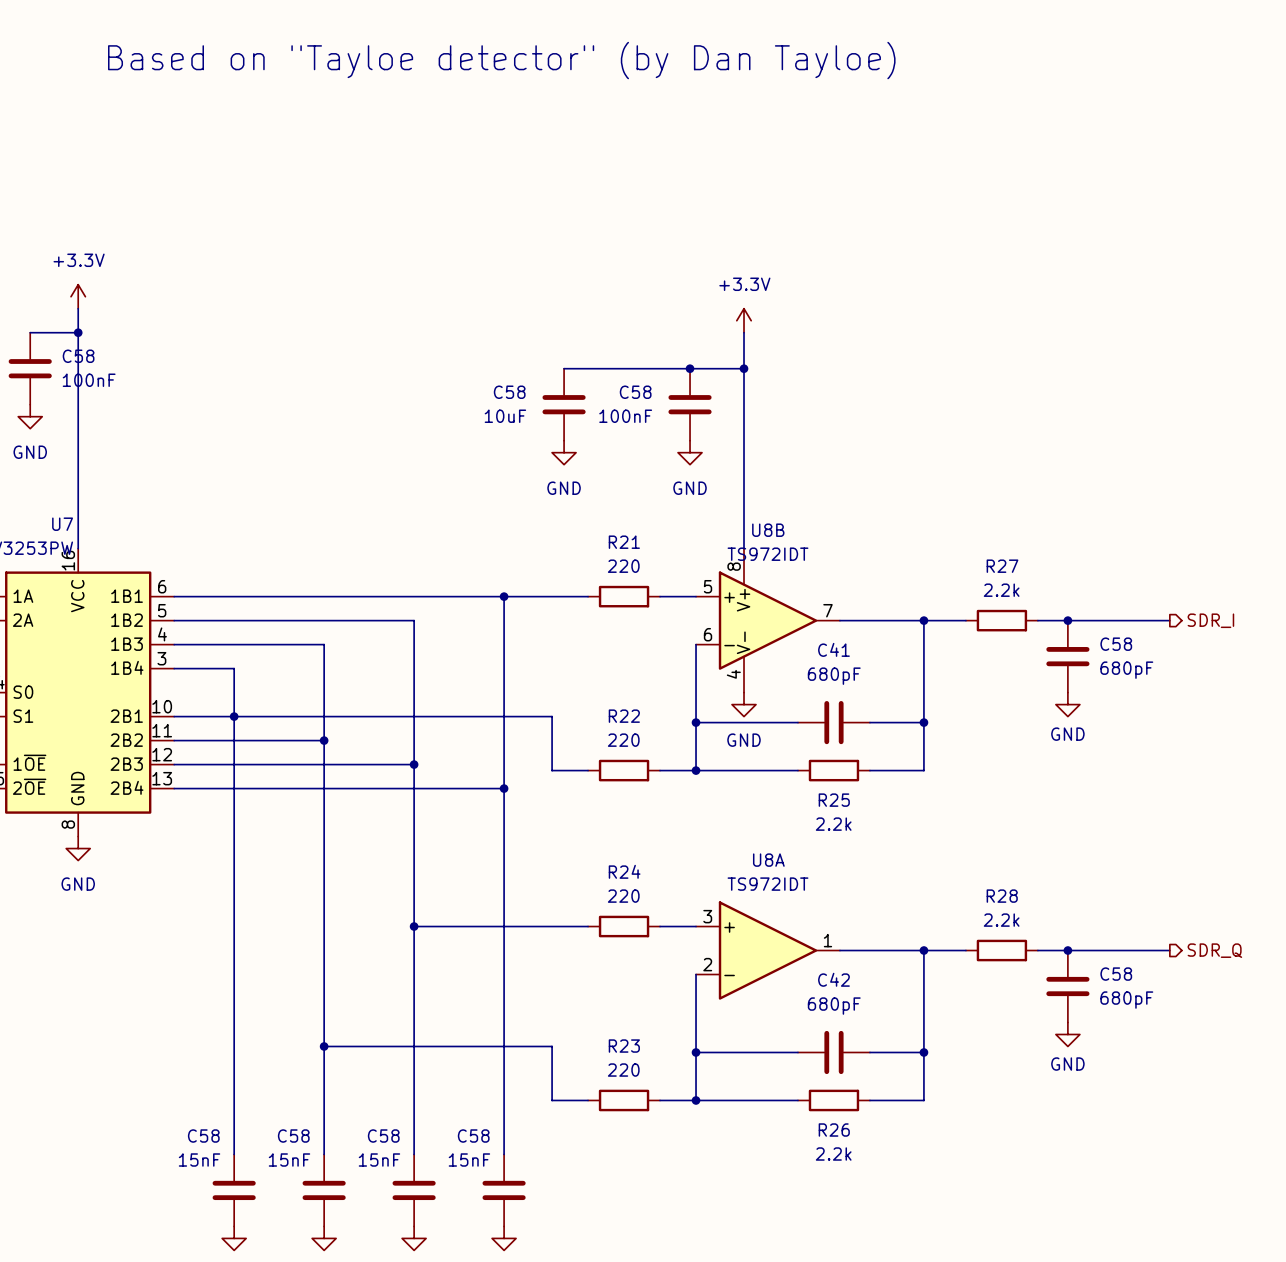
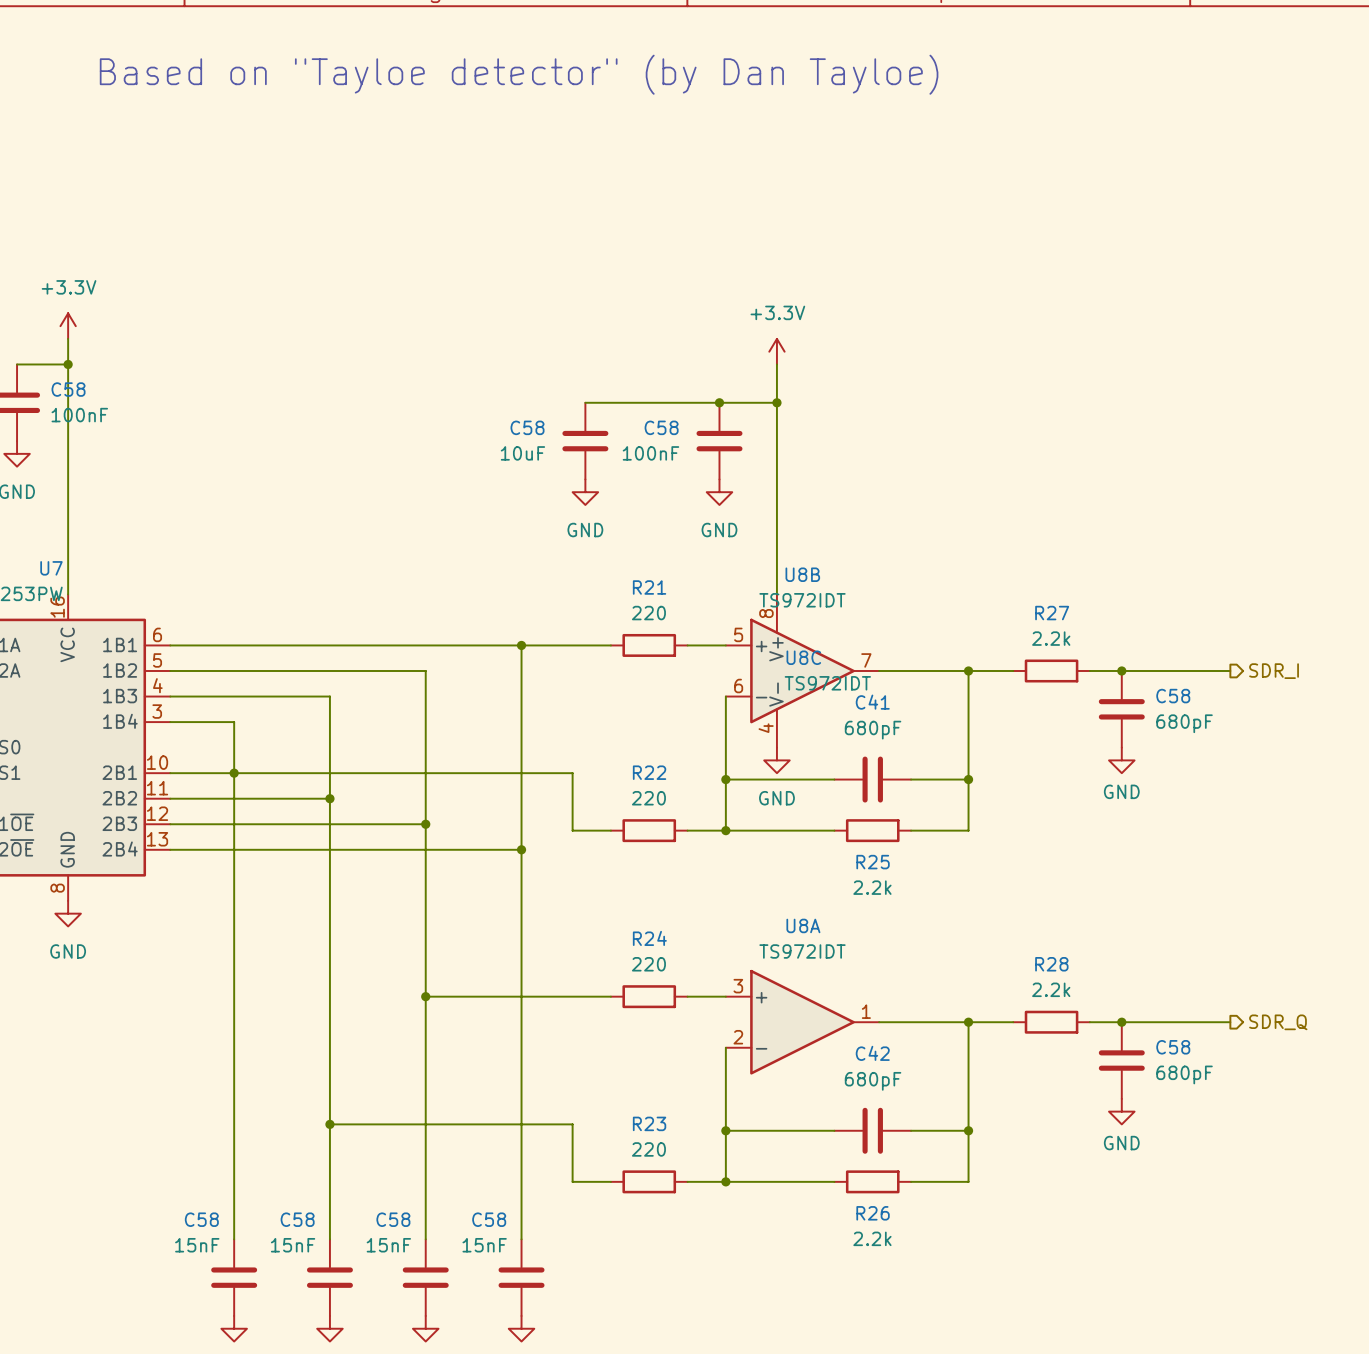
U8C name: none -> U8C (803, 657)
U8C value: none -> TS972IDT (827, 683)

